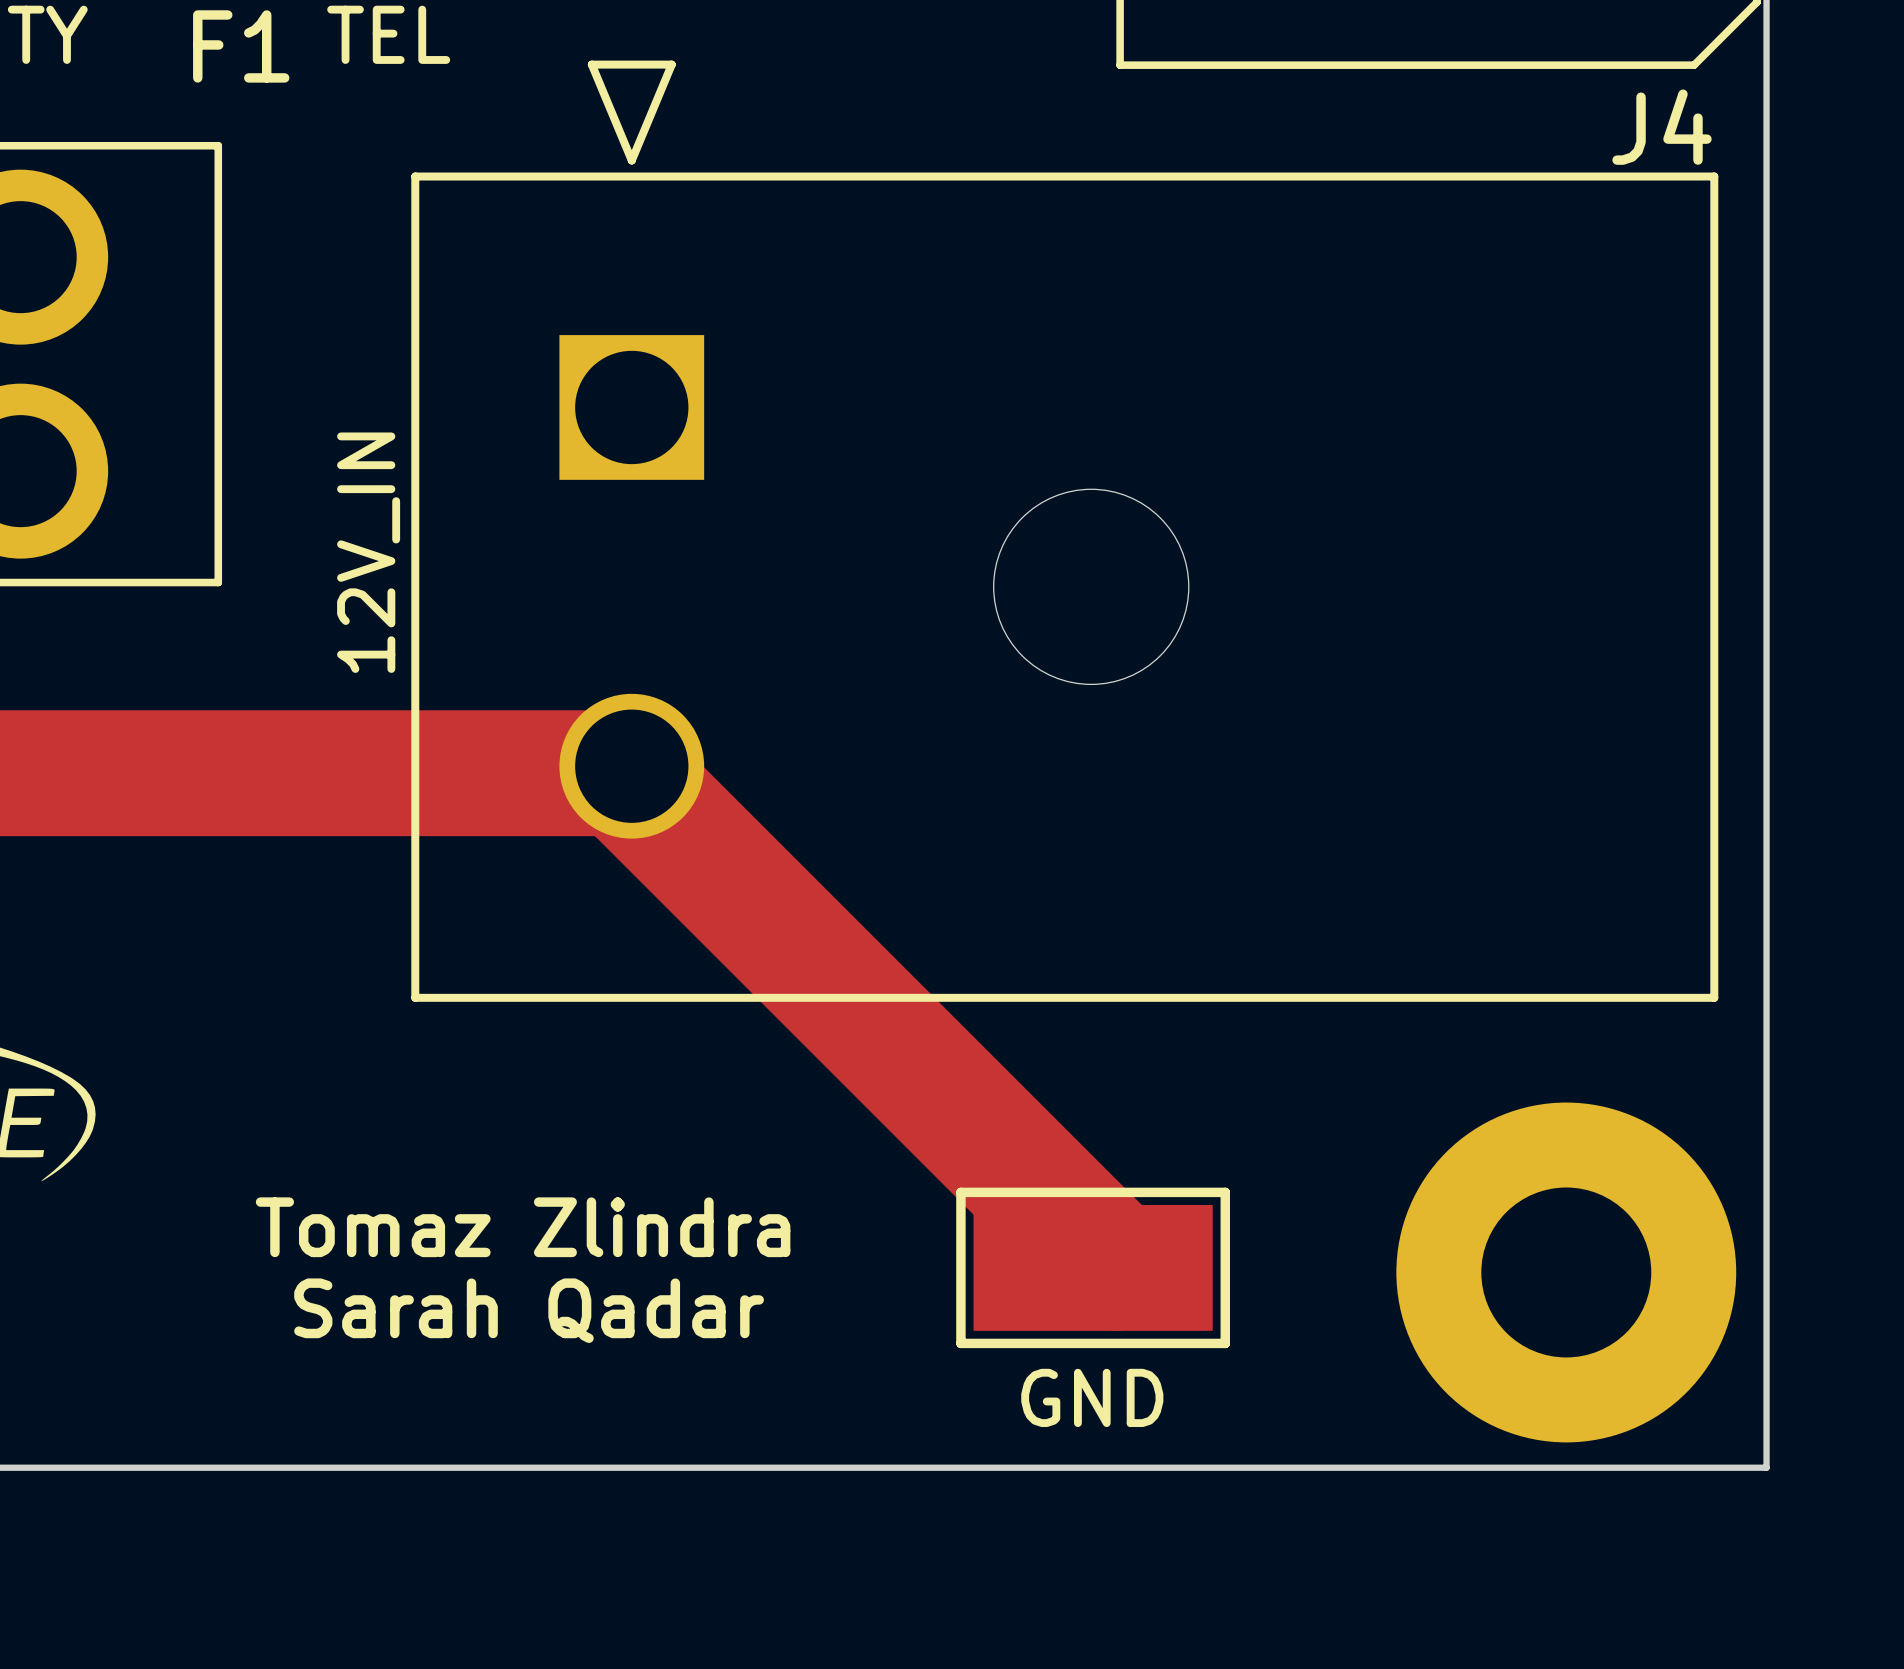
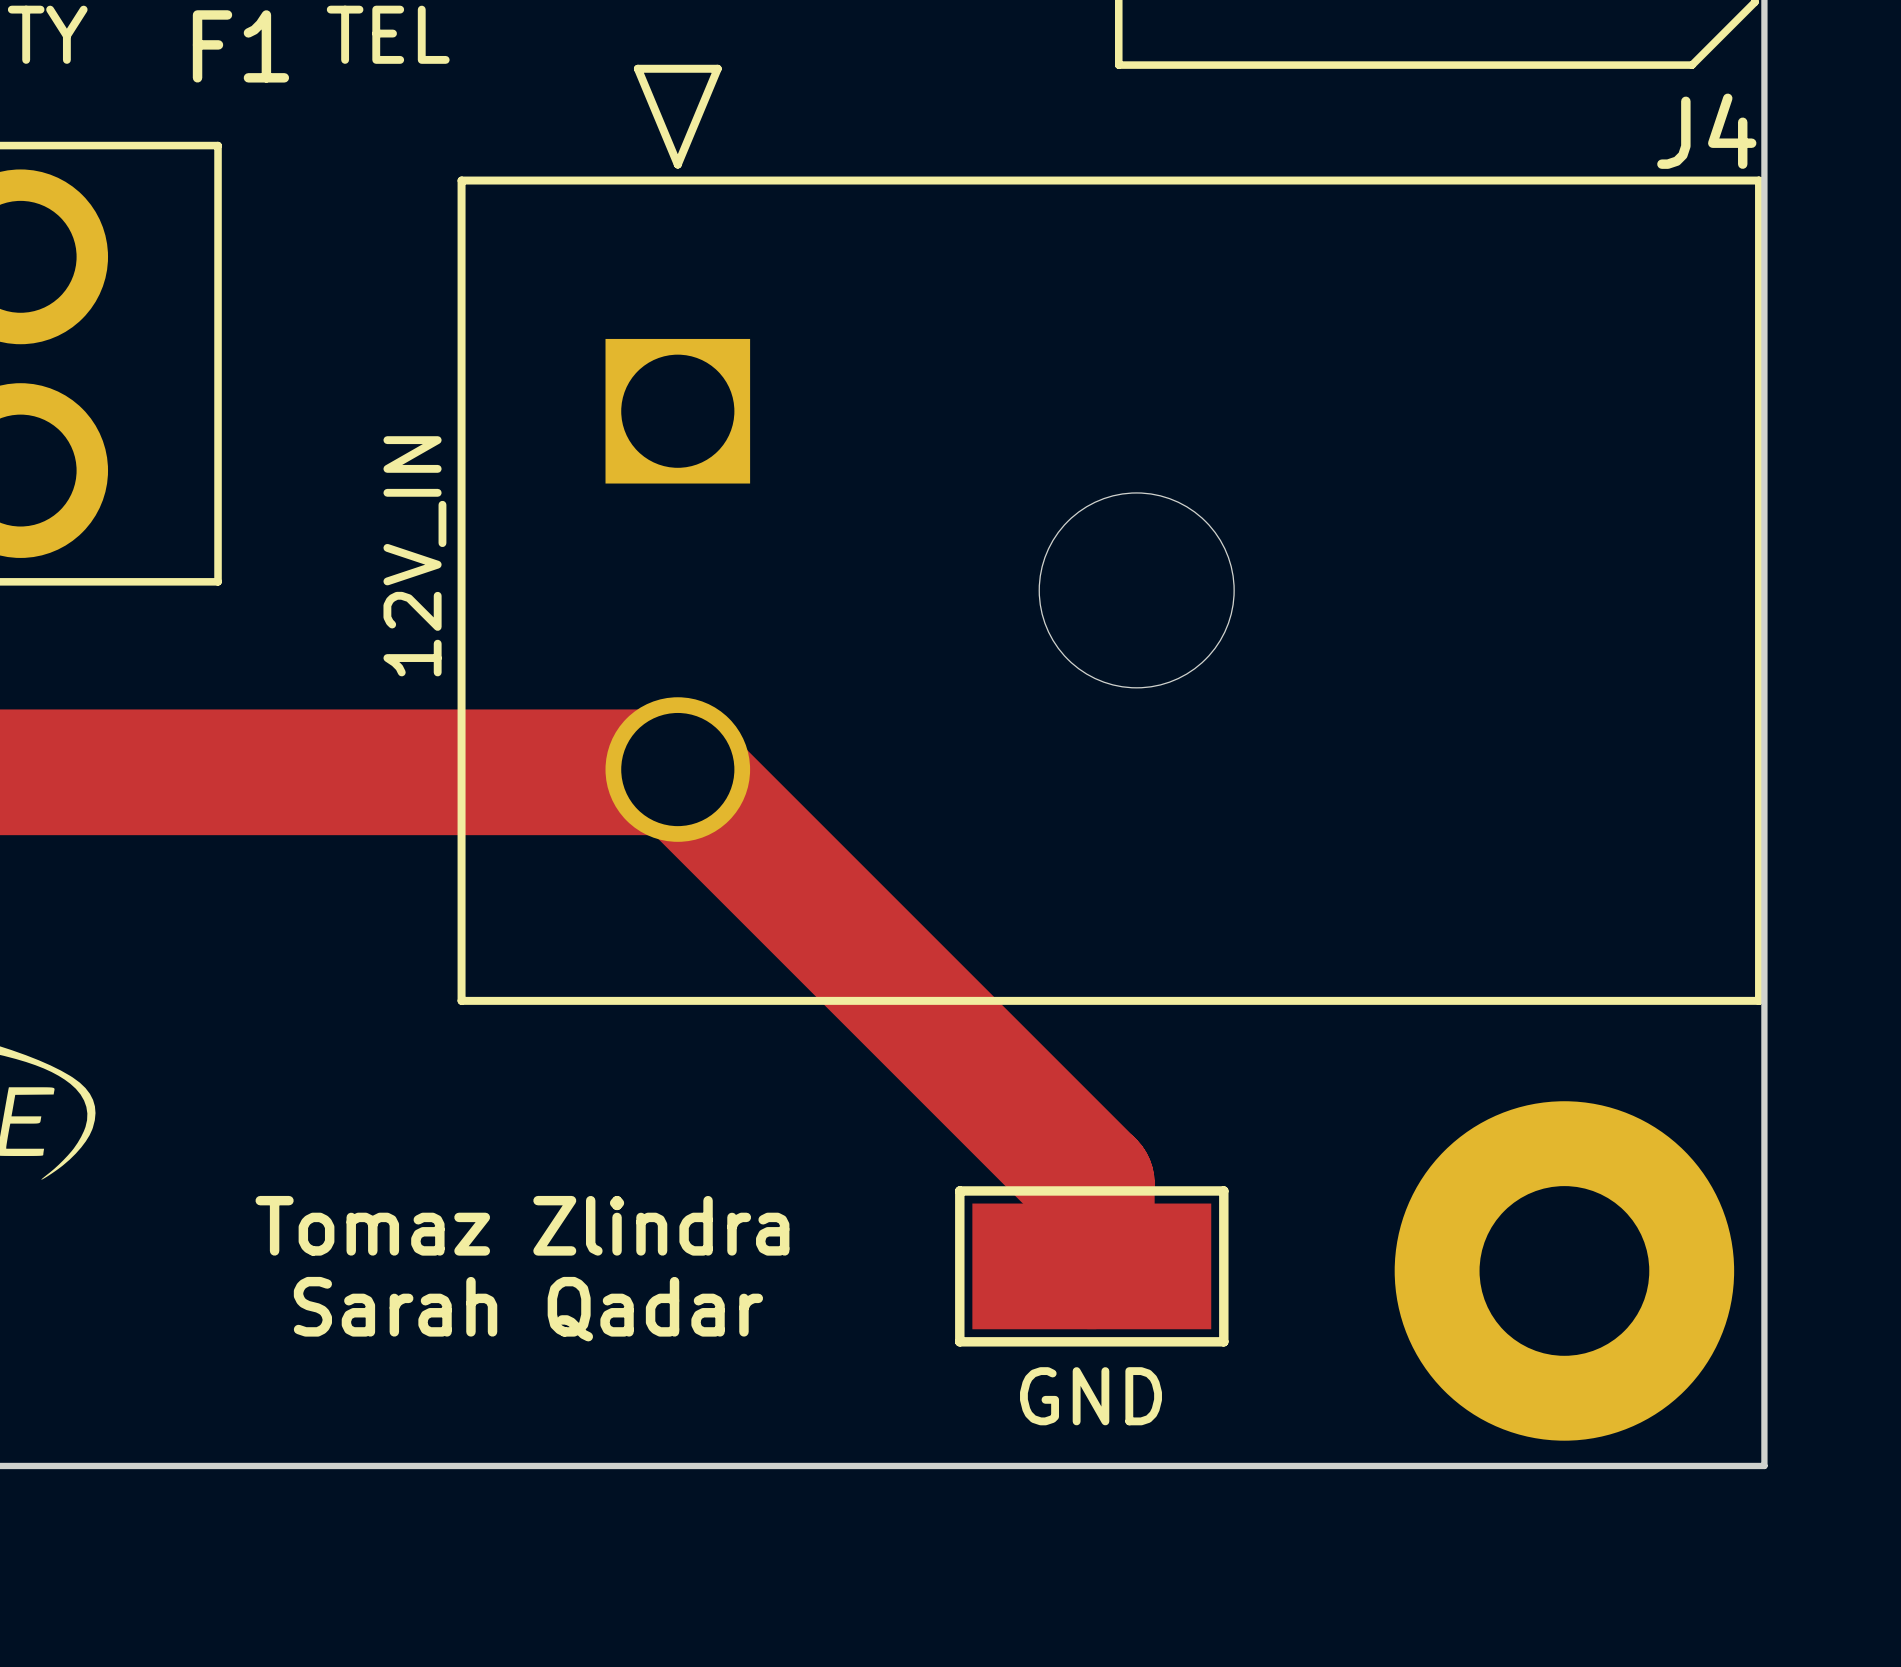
J4 position: (1064, 531) -> (1110, 534)
top track: (624, 773) (631, 766) (631, 783) (1115, 1267) -> (624, 772) (675, 772) (677, 769) (1091, 1183) (1091, 1266)

